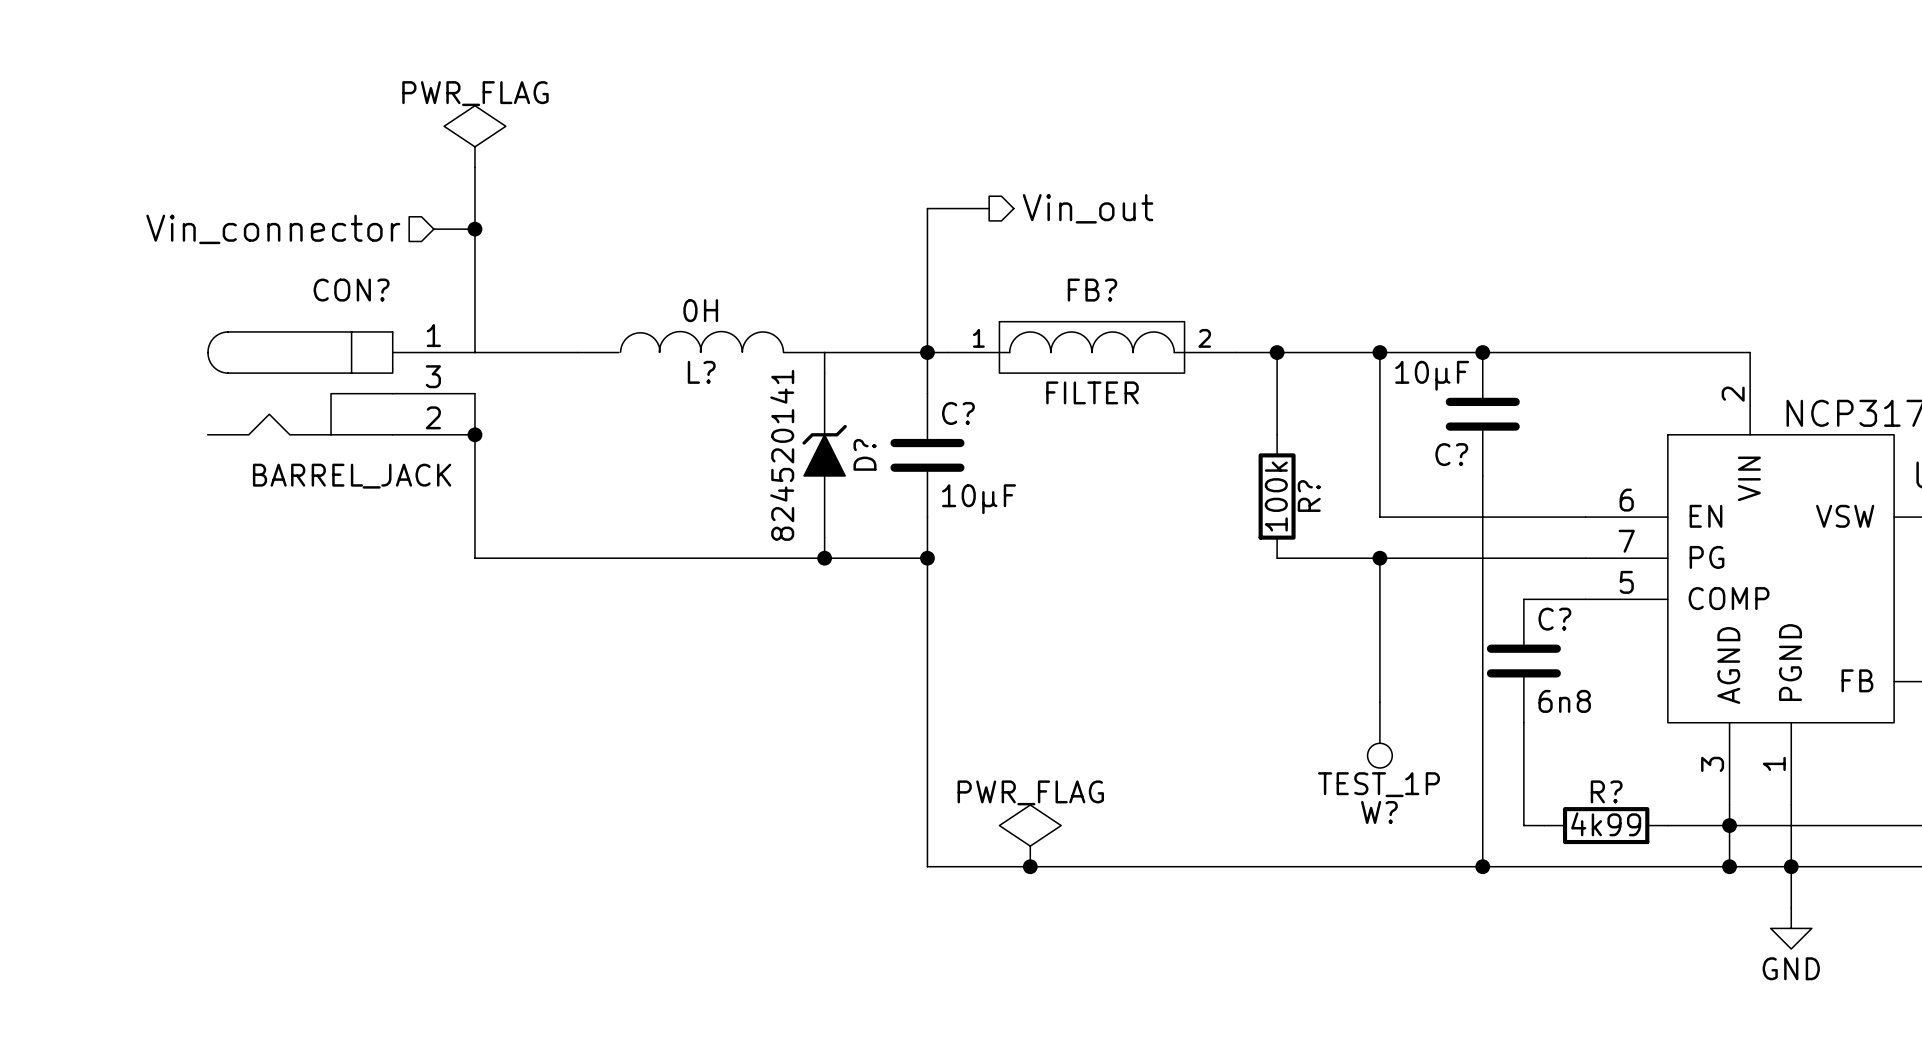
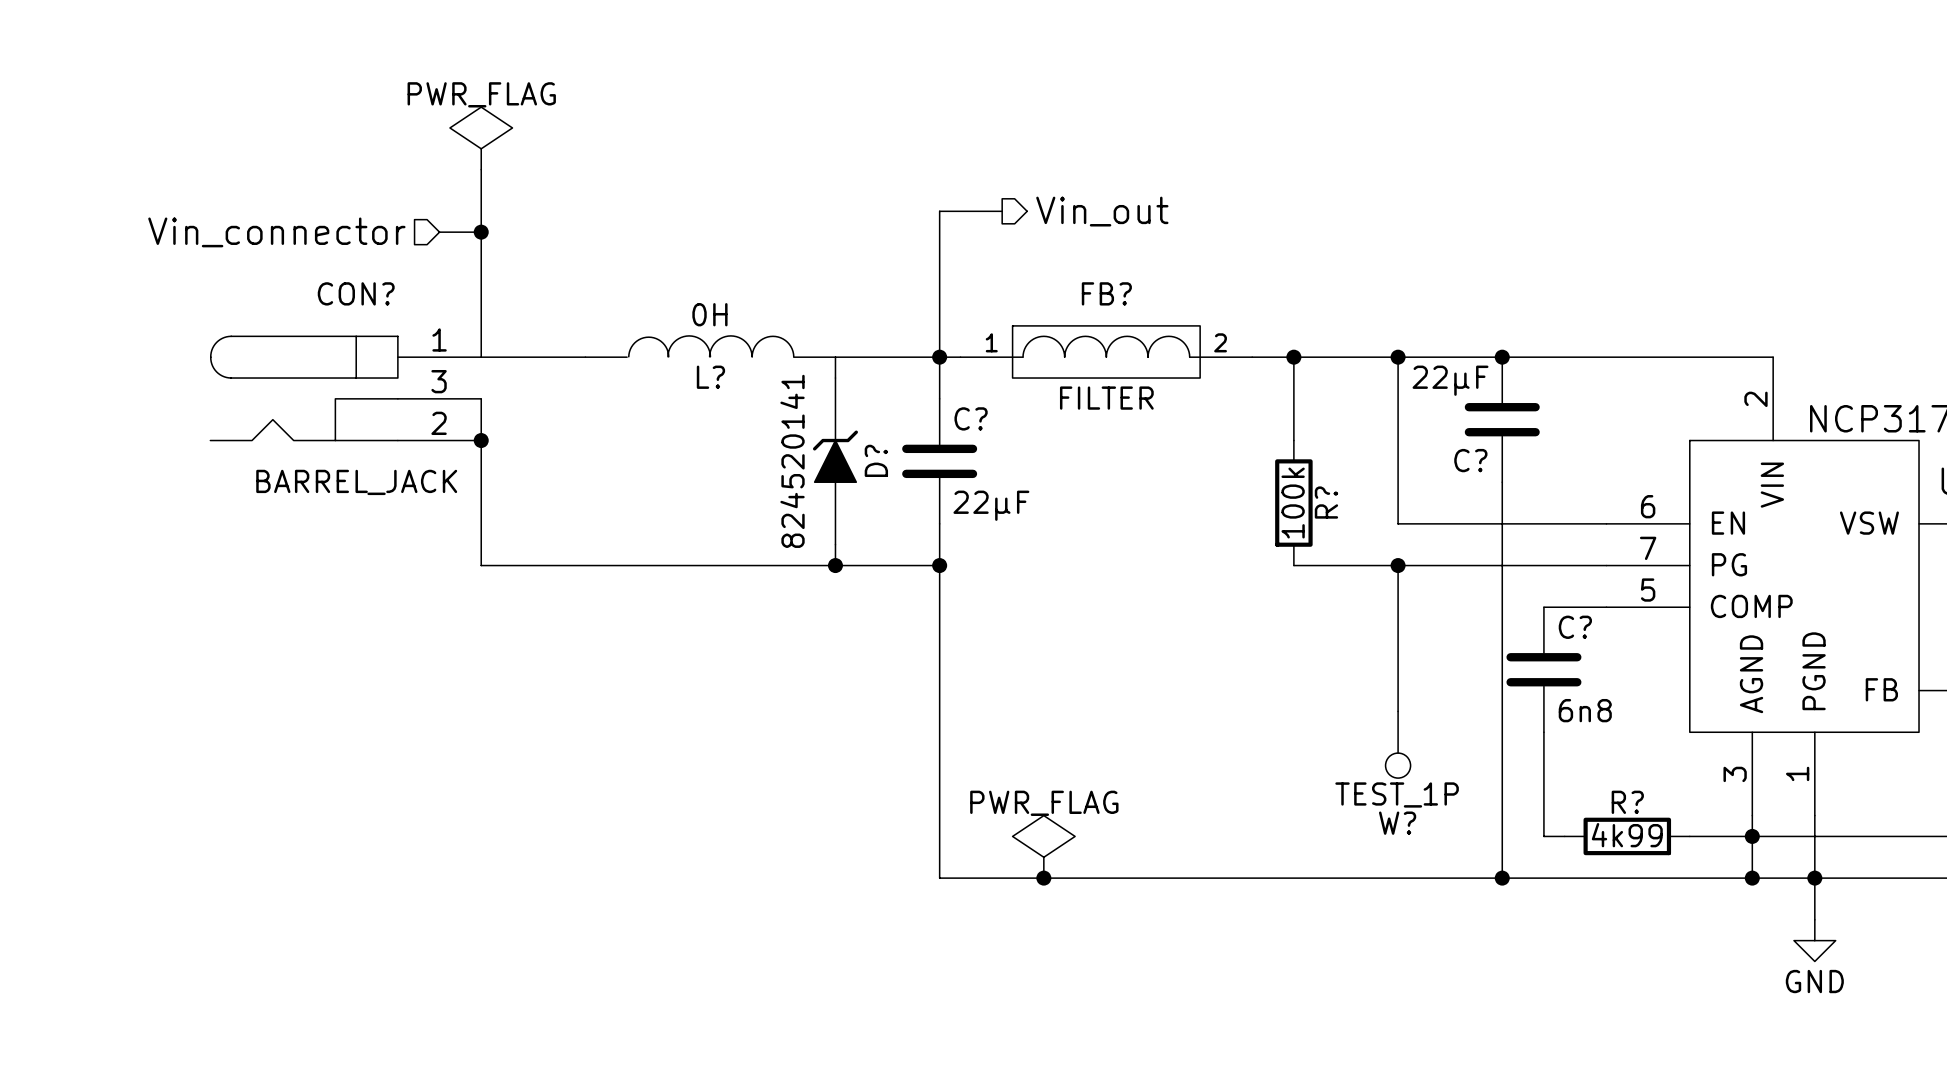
C? value: 10µF (1432, 375) -> 22µF (1450, 380)
C? value: 10µF (979, 499) -> 22µF (991, 505)

